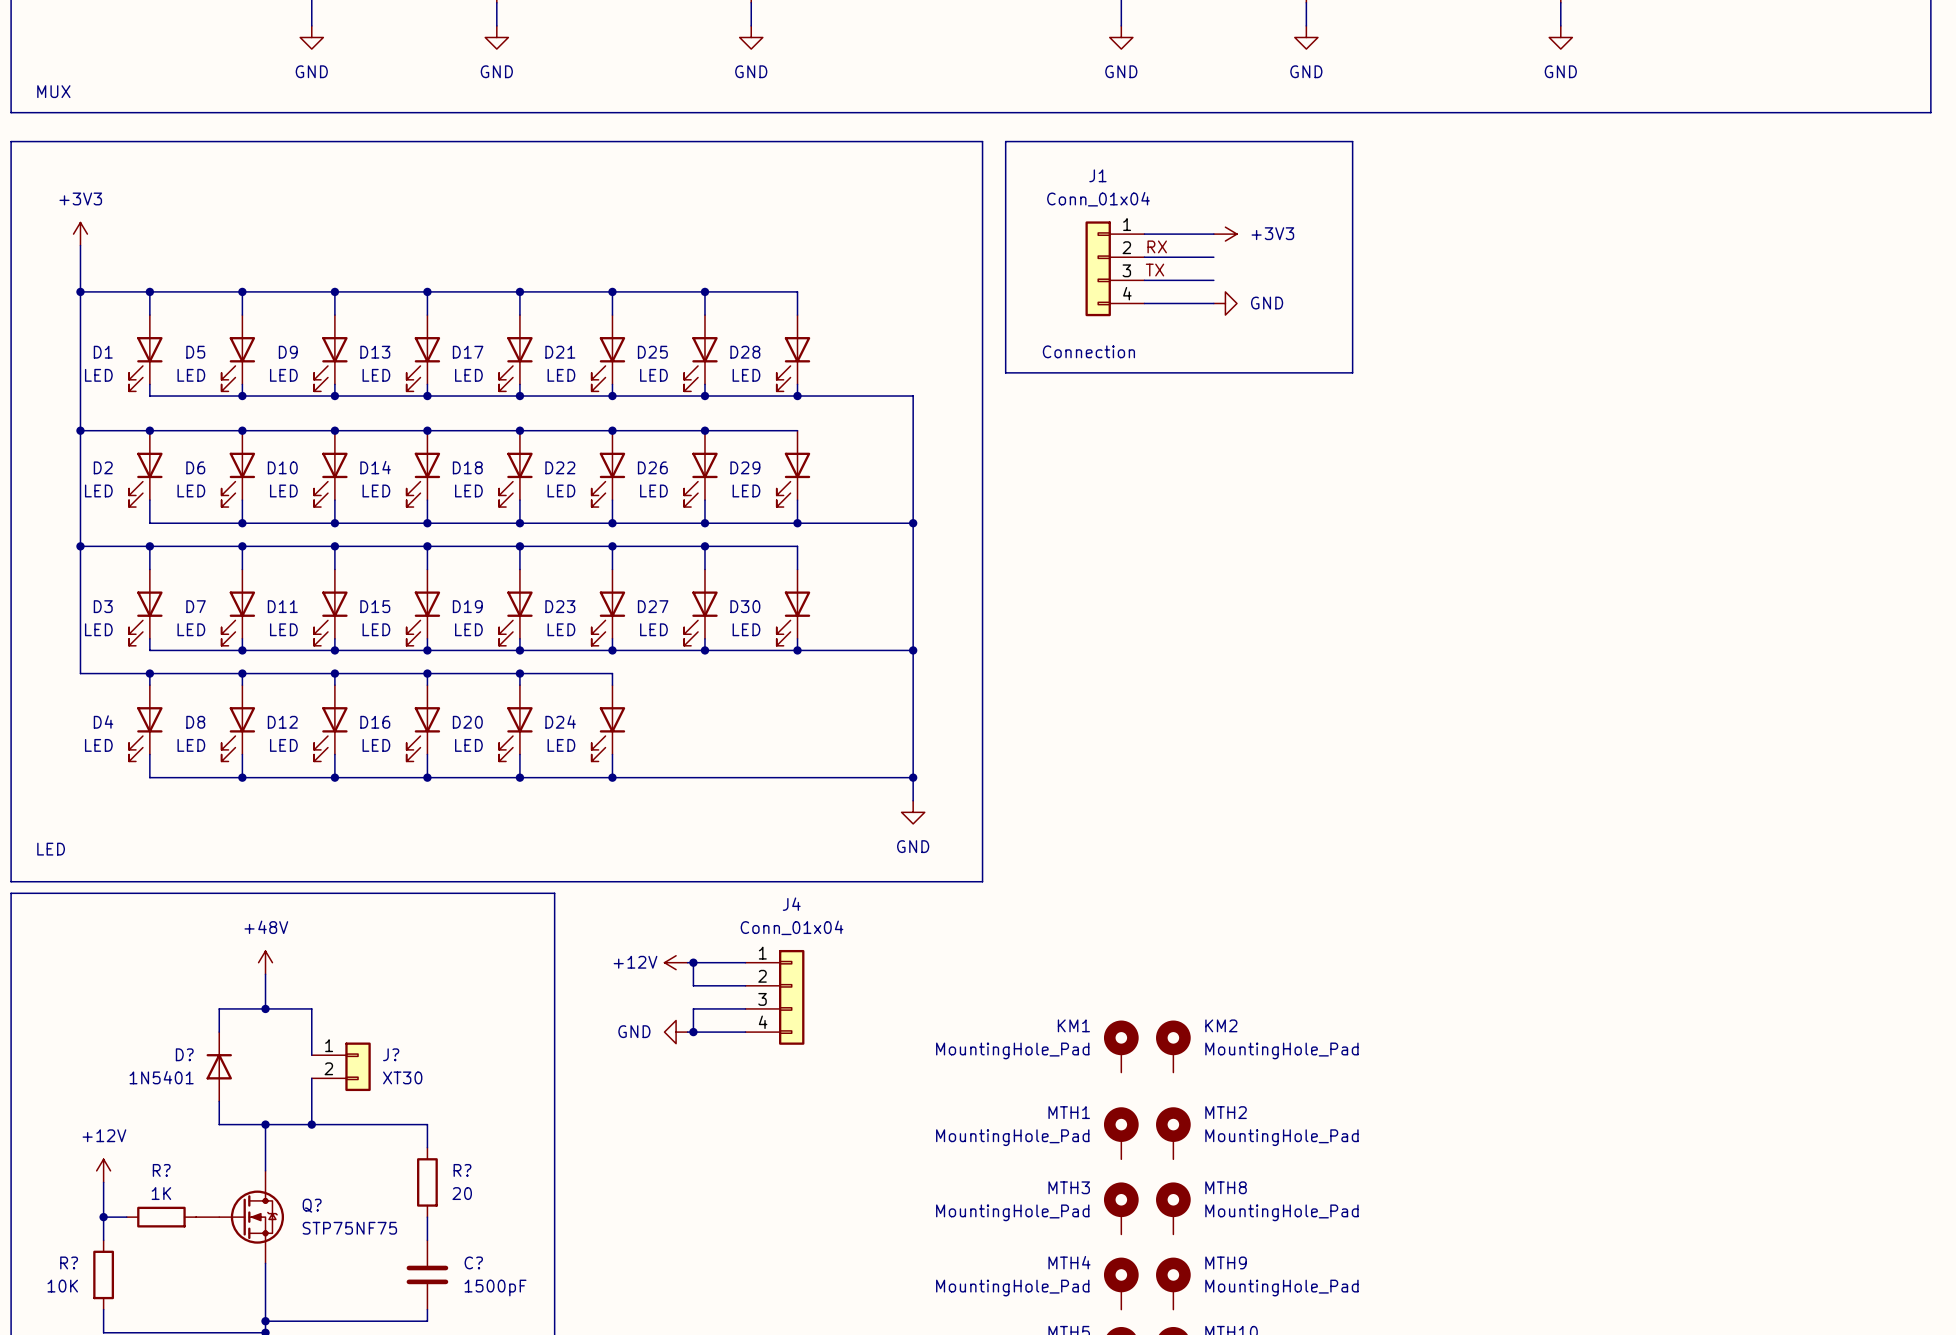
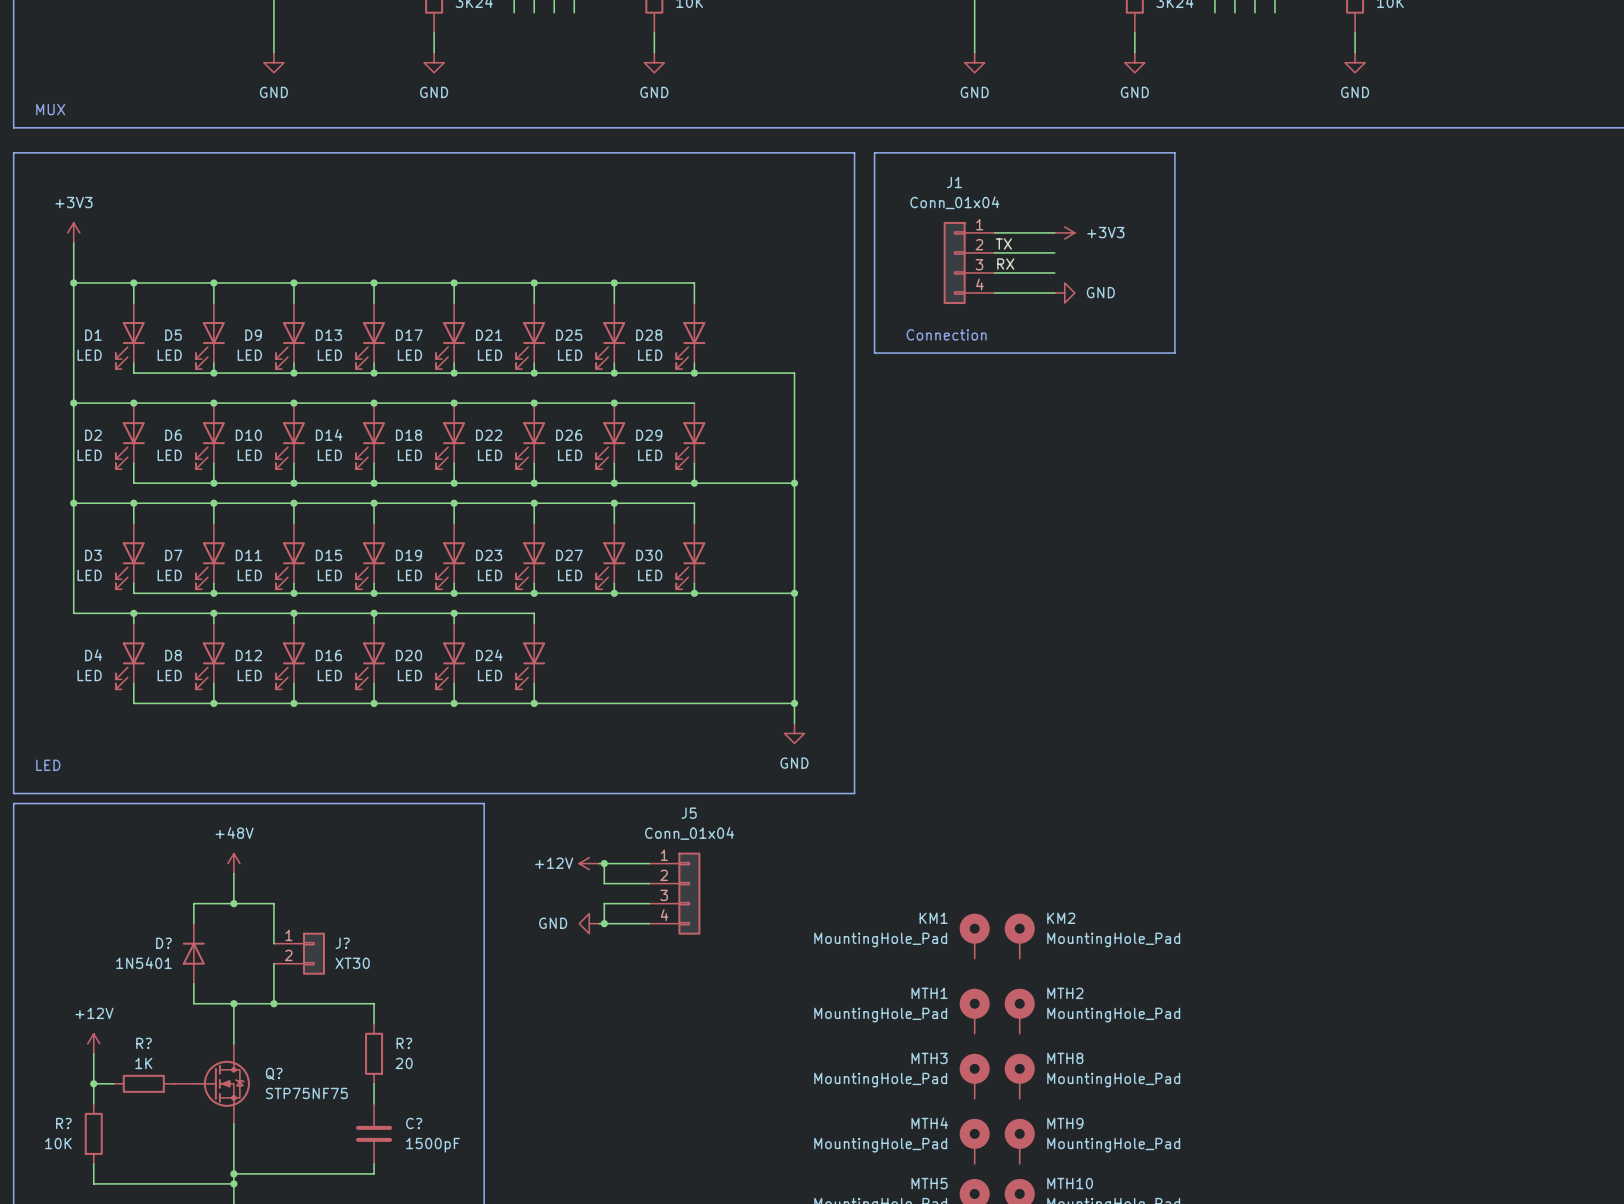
label: RX (1157, 246) -> TX (1003, 244)
label: TX (1155, 270) -> RX (1005, 264)
J4 name: J4 (791, 904) -> J5 (689, 813)

